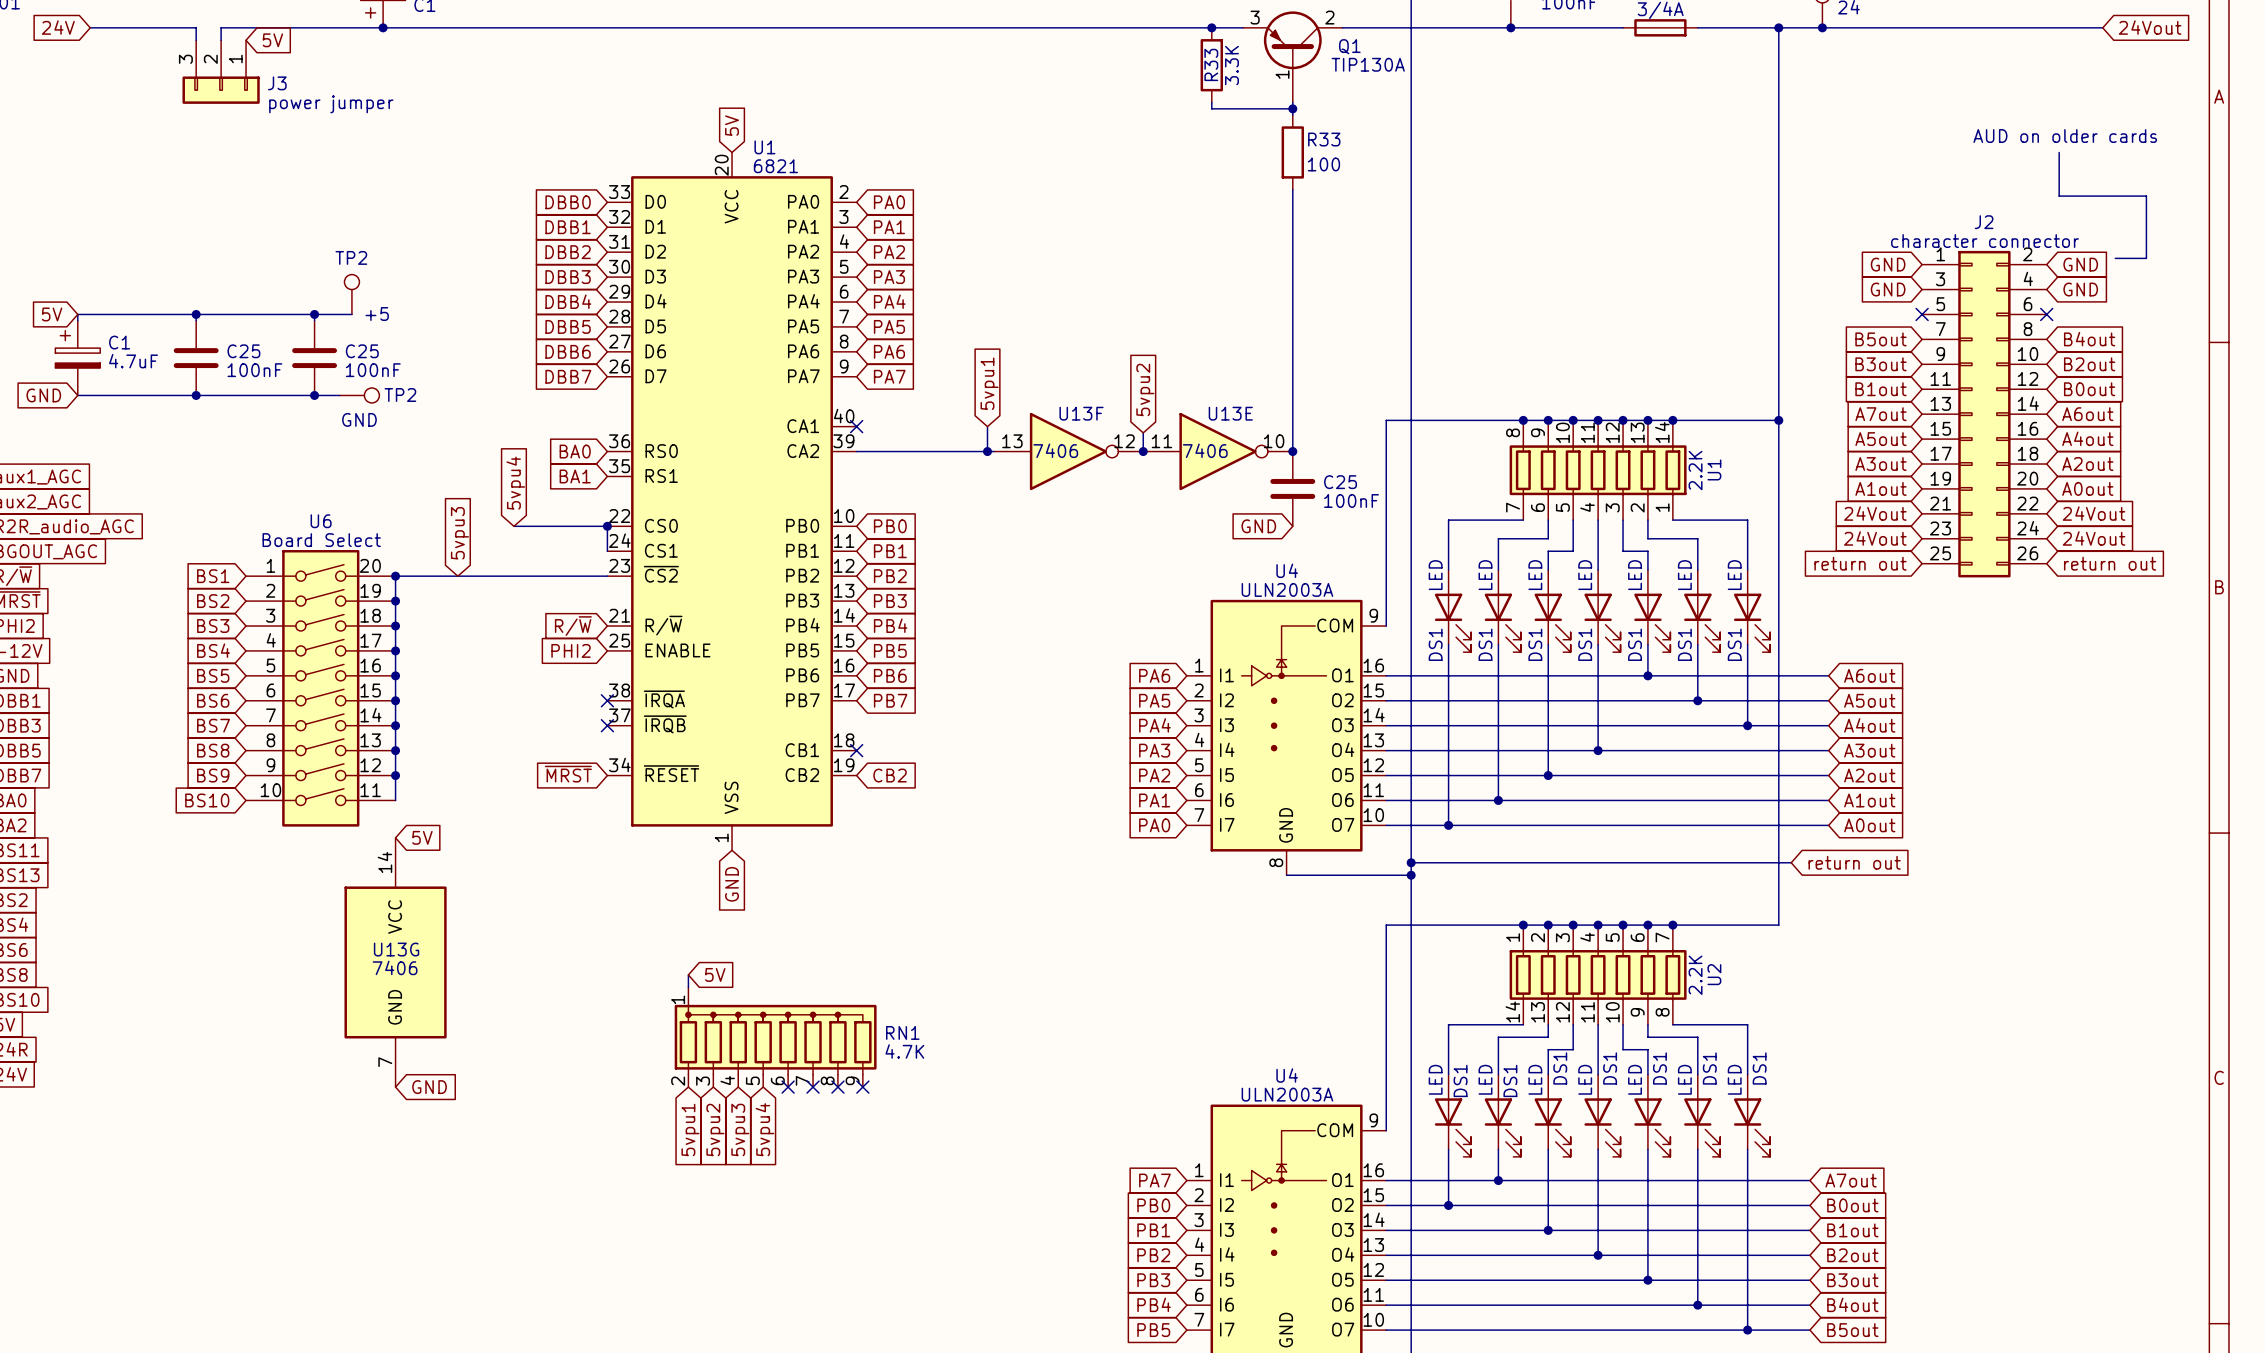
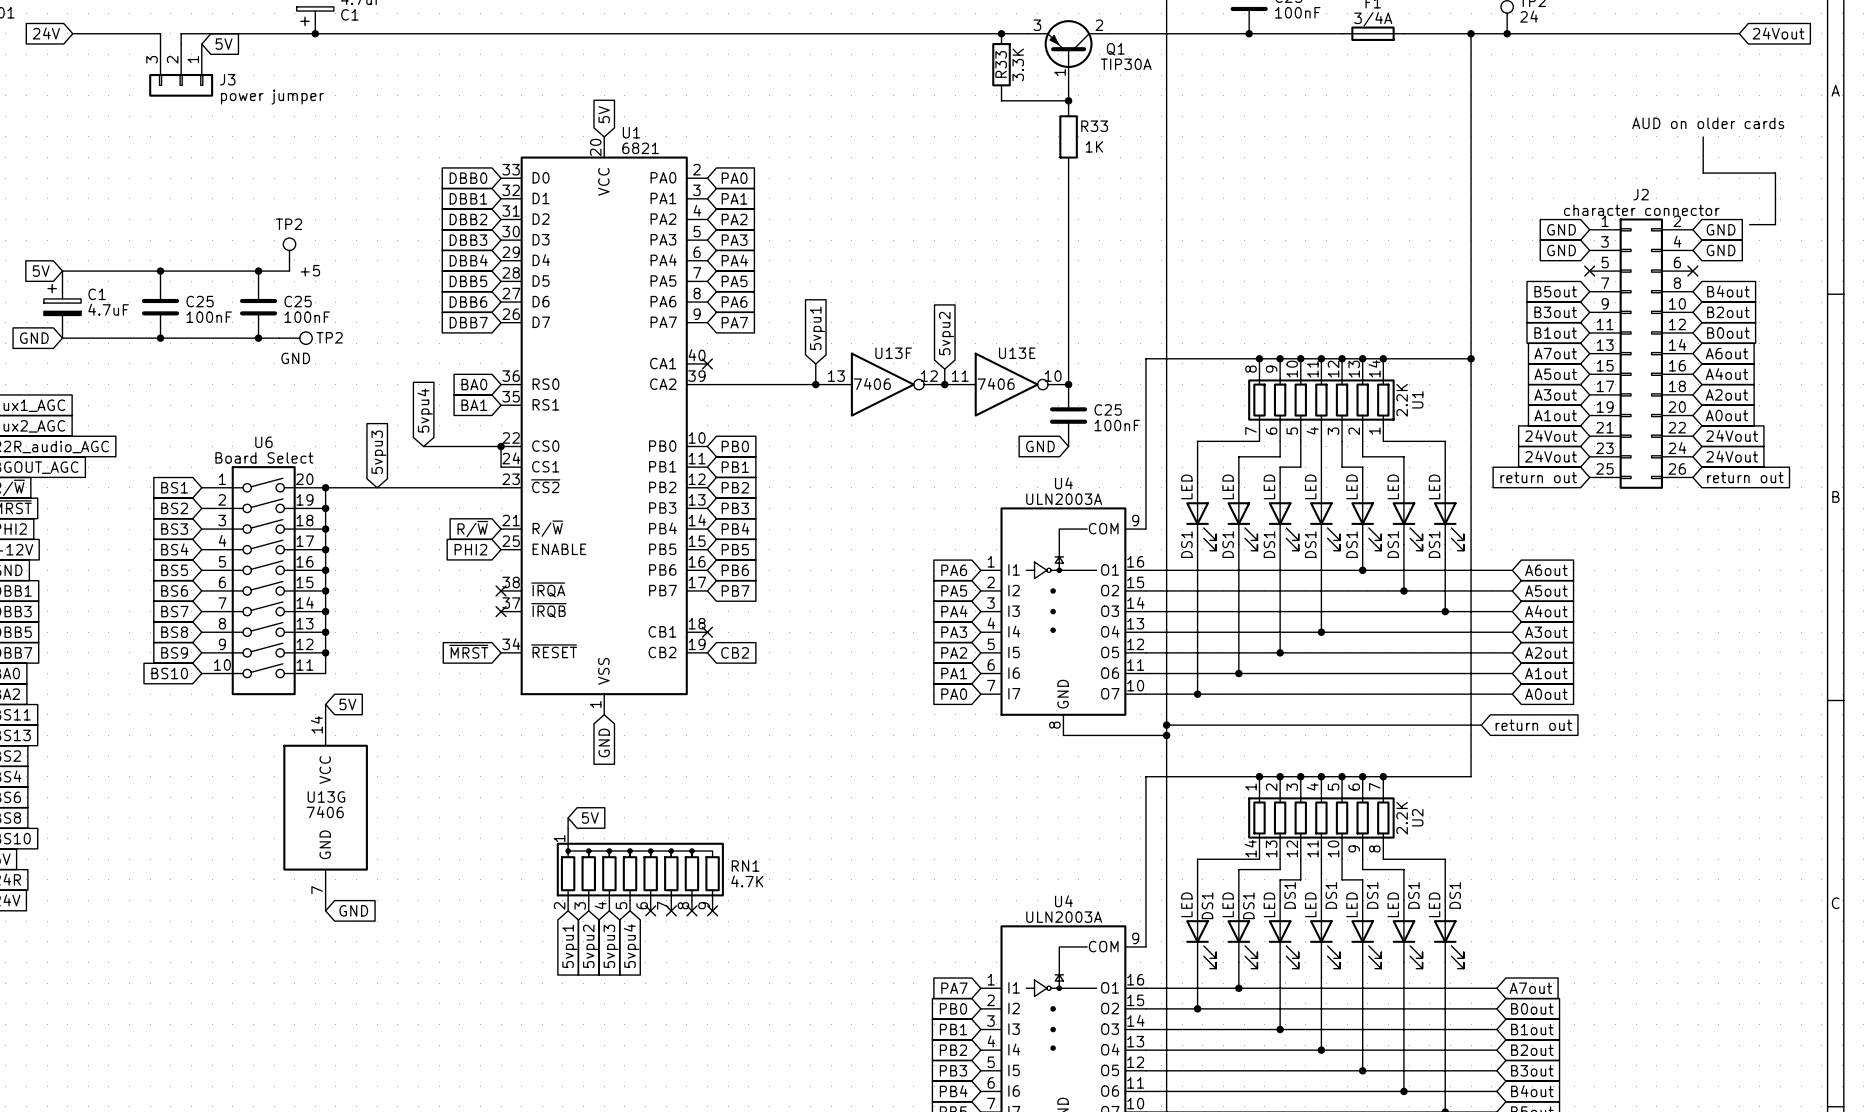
Q1 value: TIP130A (1368, 64) -> TIP30A (1126, 64)
R33 value: 100 (1323, 164) -> 1K (1094, 146)

